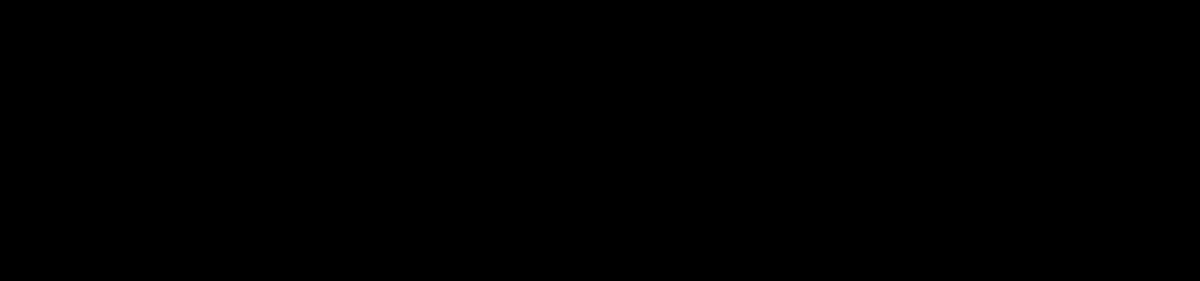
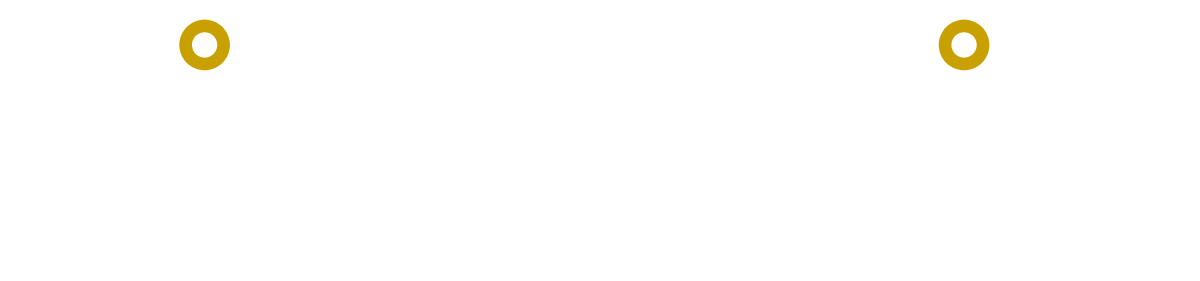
part: none -> (204, 44)
part: none -> (964, 44)

